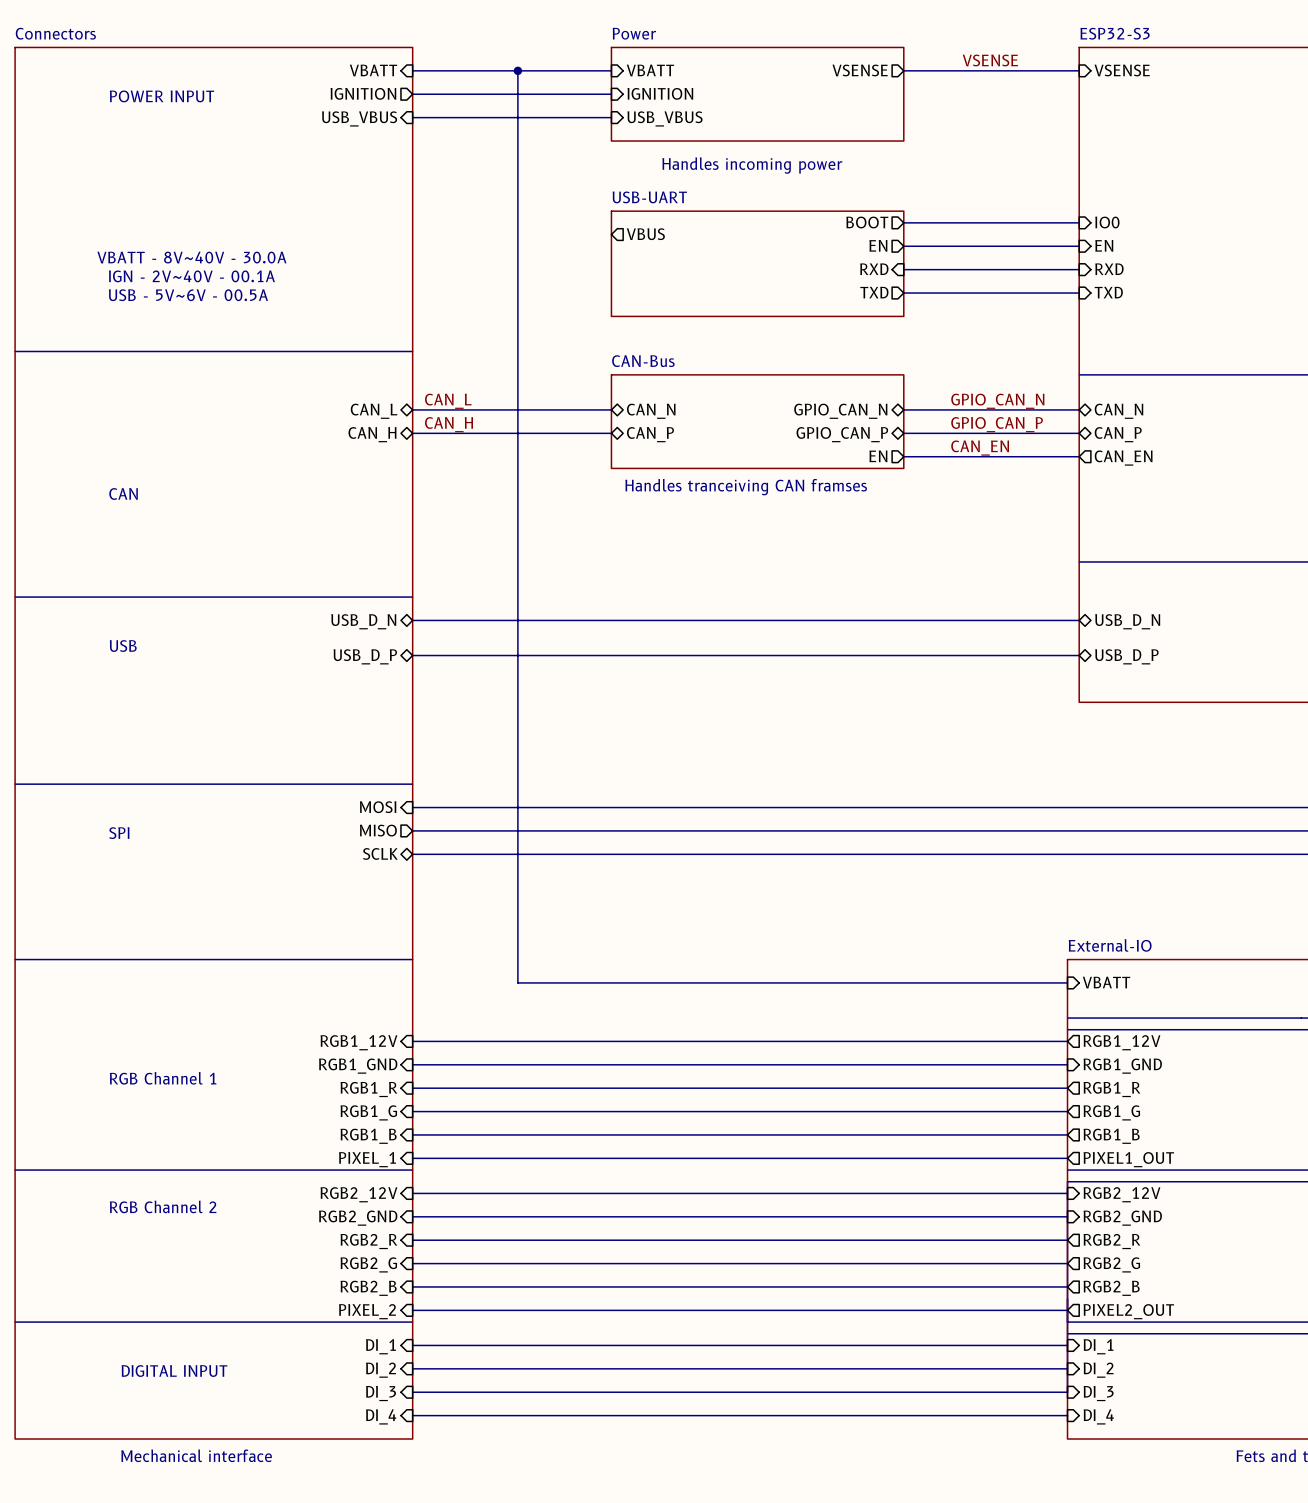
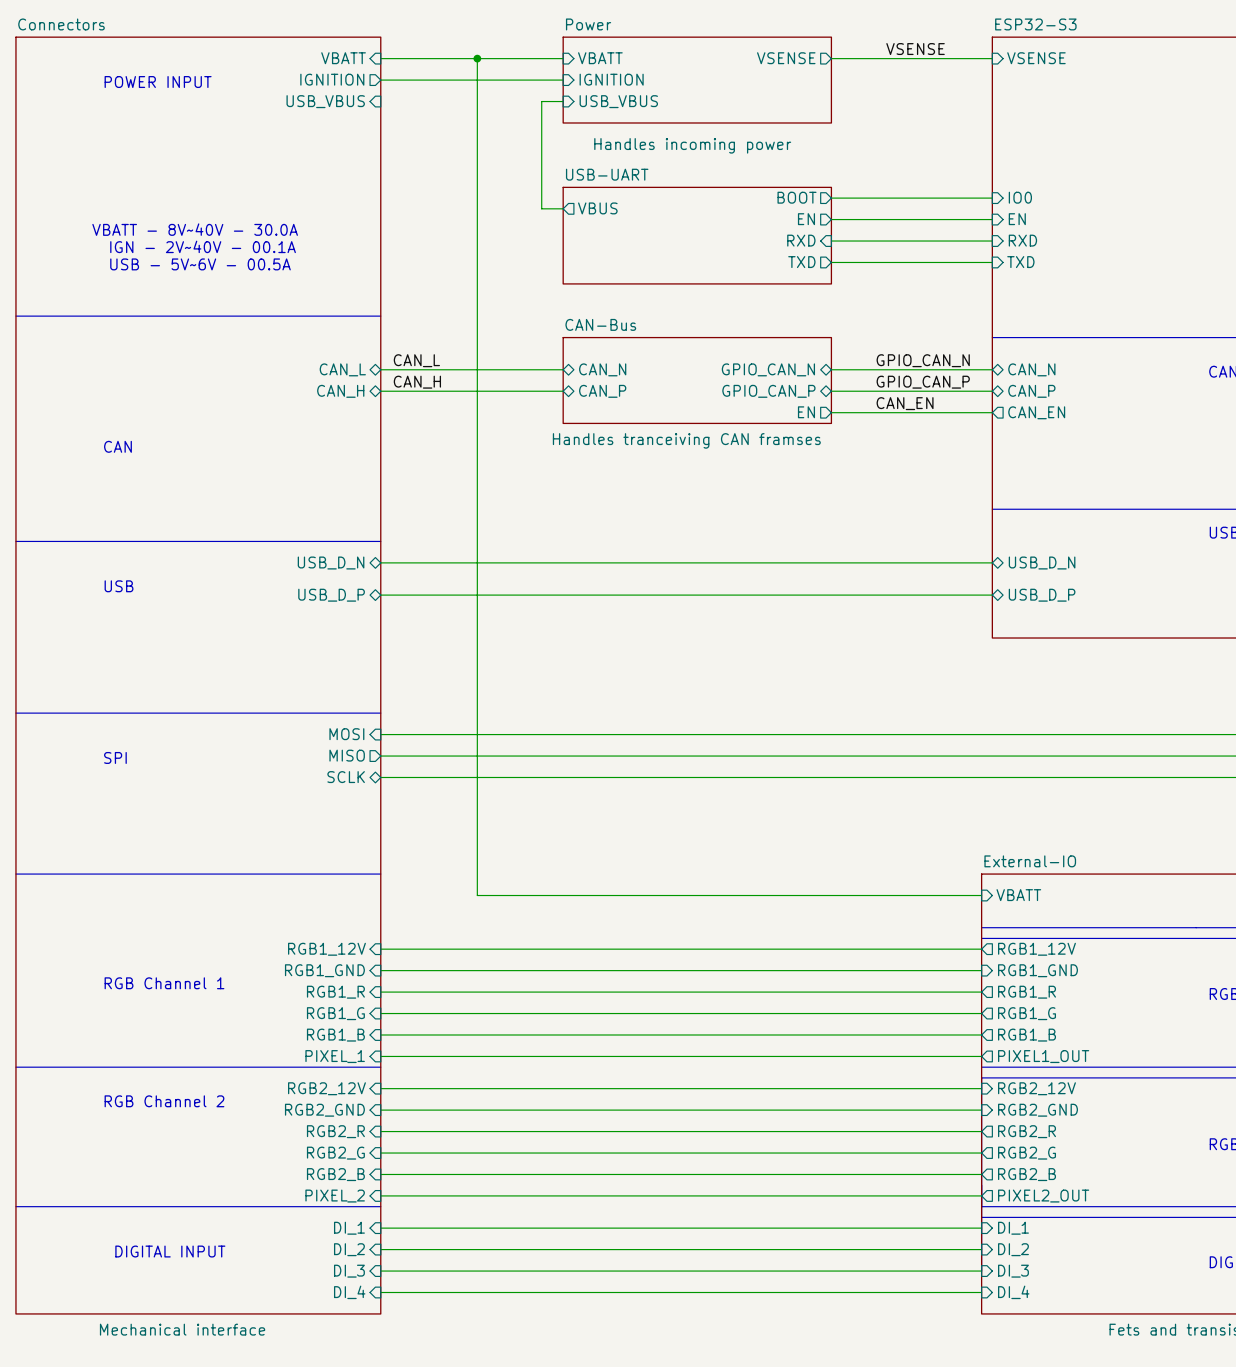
wire: (412, 117) (588, 117) -> (563, 208) (541, 208) (541, 101)

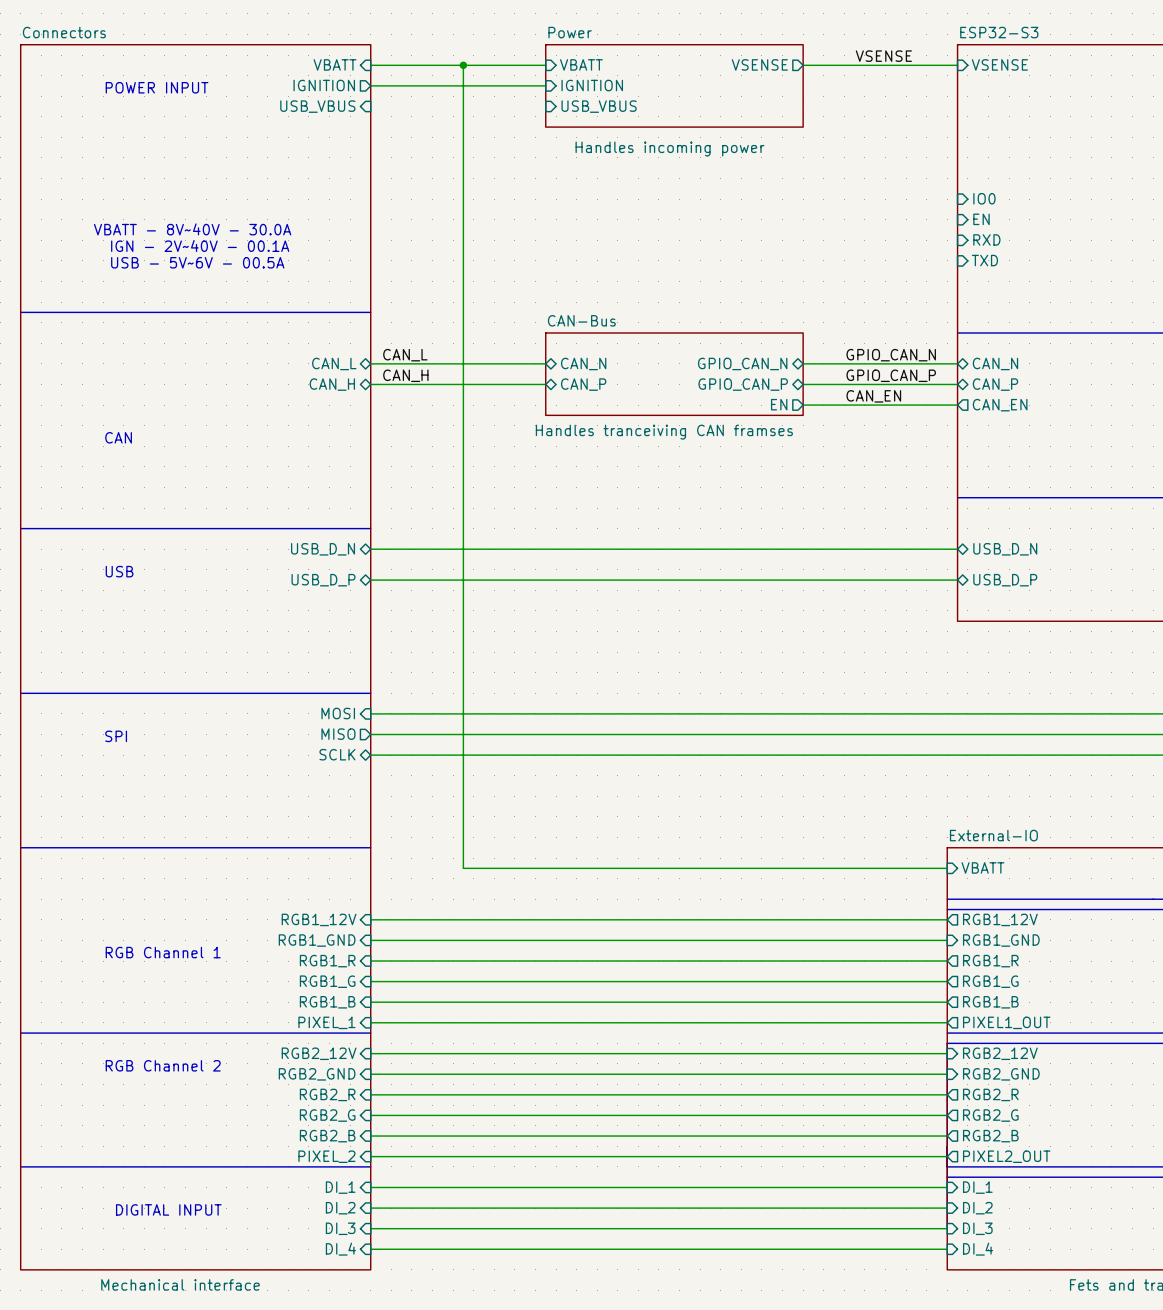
wire: (563, 101) (541, 101) (541, 208) (563, 208) -> none
sheet pin: BOOT (797, 197) -> none
wire: (831, 198) (992, 198) -> none
sheet pin: VBUS (597, 208) -> none
sheet pin: EN (806, 219) -> none
wire: (831, 219) (992, 219) -> none
sheet USB-UART: (697, 235) -> none
sheet pin: RXD (801, 240) -> none
wire: (831, 241) (992, 241) -> none
sheet pin: TXD (801, 262) -> none
wire: (831, 262) (992, 262) -> none

